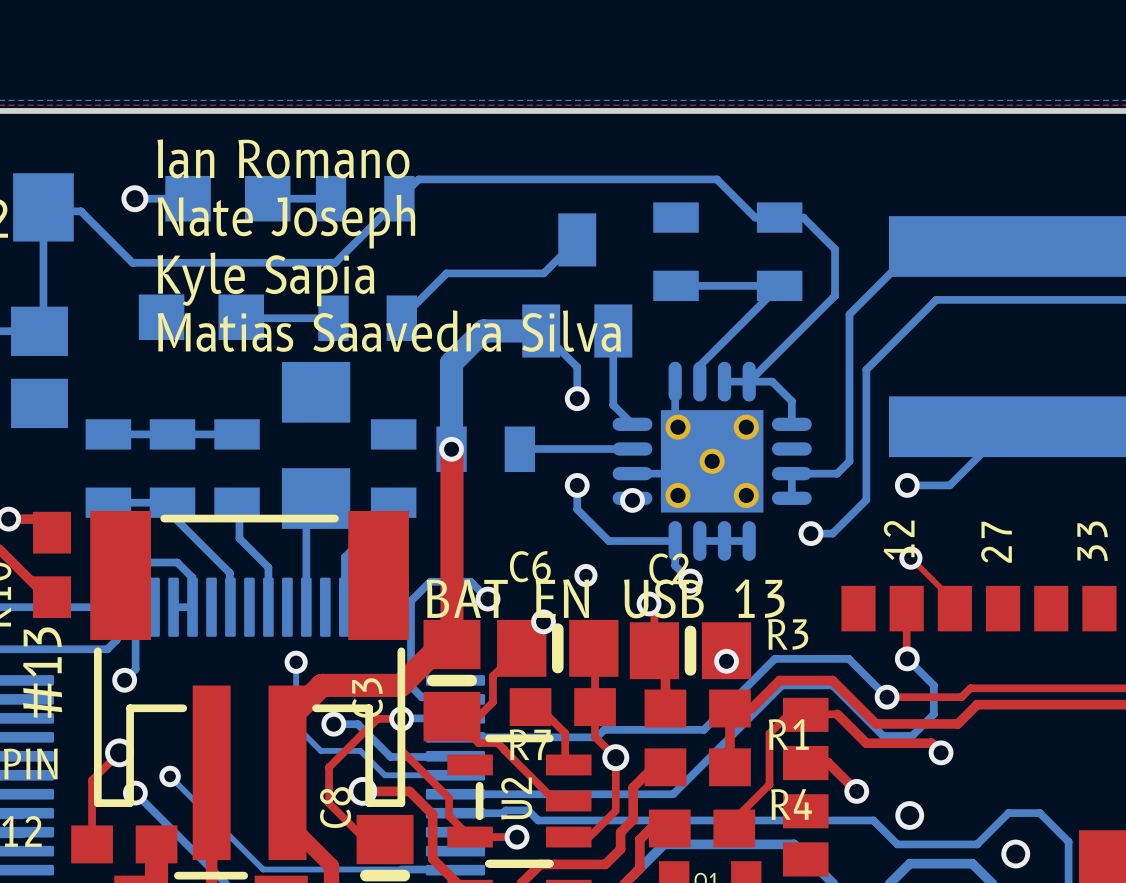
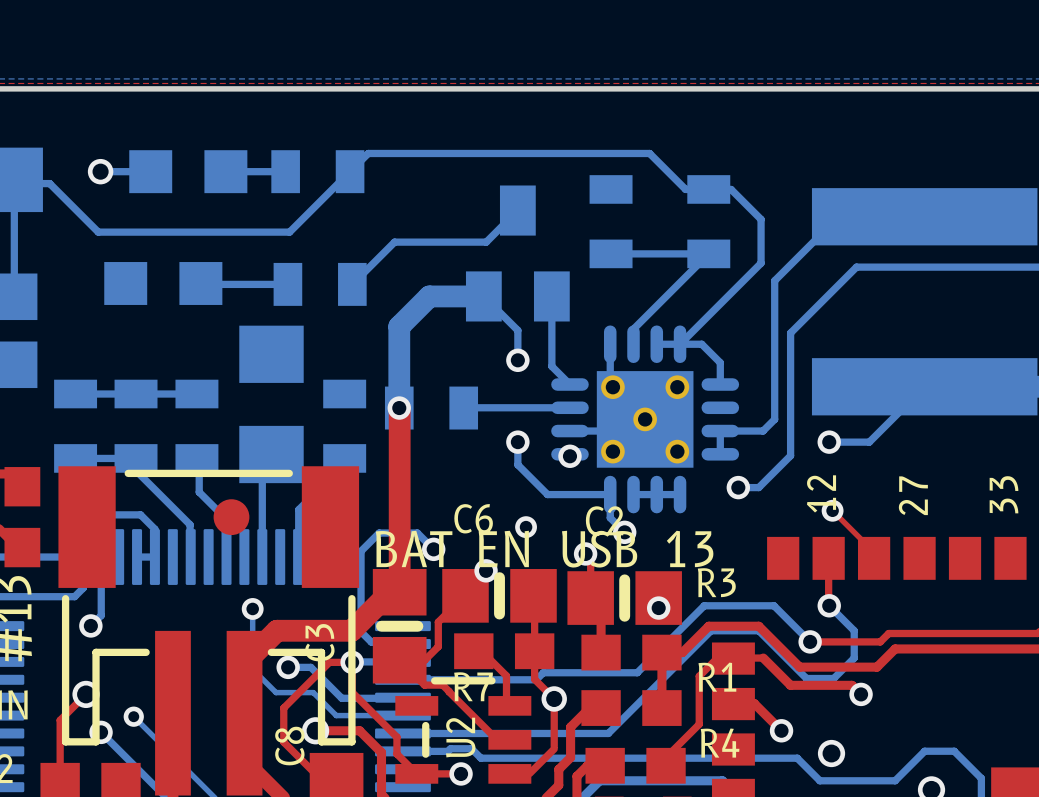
text: Ian Romano (283, 158) -> none
text: Nate Joseph (286, 221) -> none
text: Kyle Sapia (266, 279) -> none
text: Matias Saavedra Silva (389, 331) -> none
part: none -> (231, 517)

